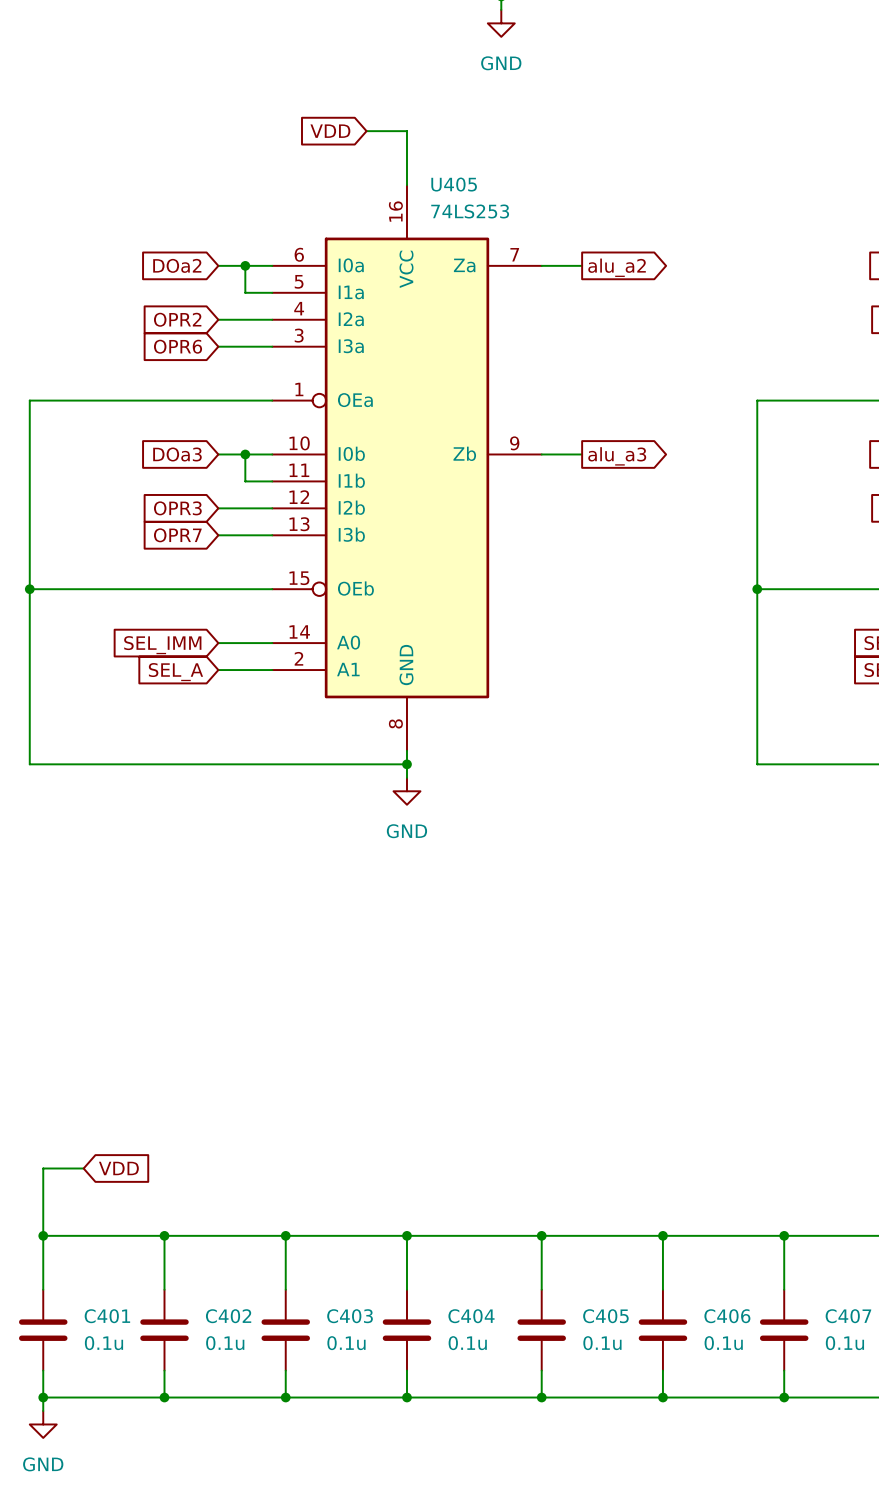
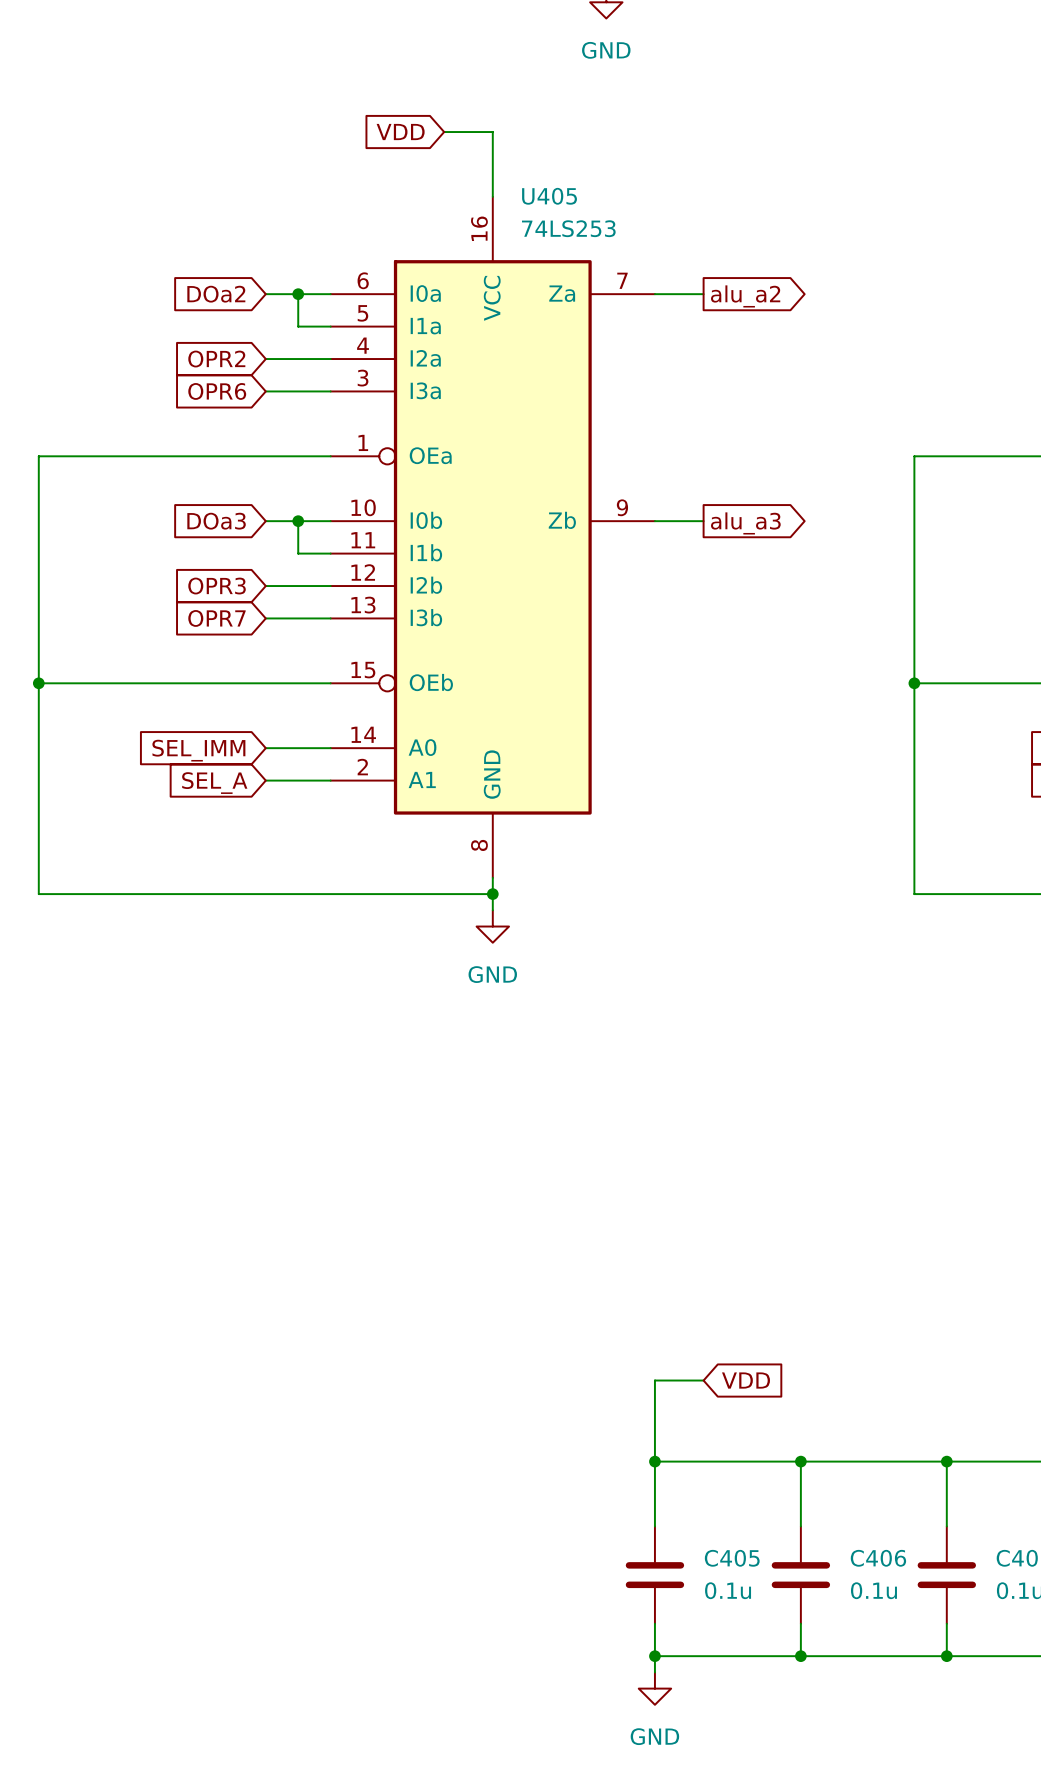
wire: (83, 1168) (43, 1168) (43, 1289) -> none
global label: VDD (118, 1168) -> none
global label: none -> VDD (746, 1380)
wire: (43, 1235) (541, 1235) -> (703, 1380) (654, 1380) (654, 1461)
junction: (43, 1235) -> none
wire: (164, 1235) (164, 1289) -> none
junction: (164, 1235) -> none
wire: (285, 1235) (285, 1289) -> none
junction: (285, 1235) -> none
wire: (406, 1235) (406, 1289) -> none
junction: (406, 1235) -> none
C401: 0.1u (43, 1330) -> none
C402: 0.1u (164, 1330) -> none
C403: 0.1u (285, 1330) -> none
C404: 0.1u (406, 1330) -> none
wire: (43, 1370) (43, 1410) -> none
wire: (164, 1370) (164, 1397) -> none
wire: (285, 1370) (285, 1397) -> none
wire: (406, 1370) (406, 1397) -> none
wire: (43, 1397) (541, 1397) -> (654, 1672) (654, 1656)
junction: (43, 1397) -> none
junction: (164, 1397) -> none
junction: (285, 1397) -> none
junction: (406, 1397) -> none
power symbol: GND (43, 1424) -> none
power symbol: none -> GND (654, 1688)

